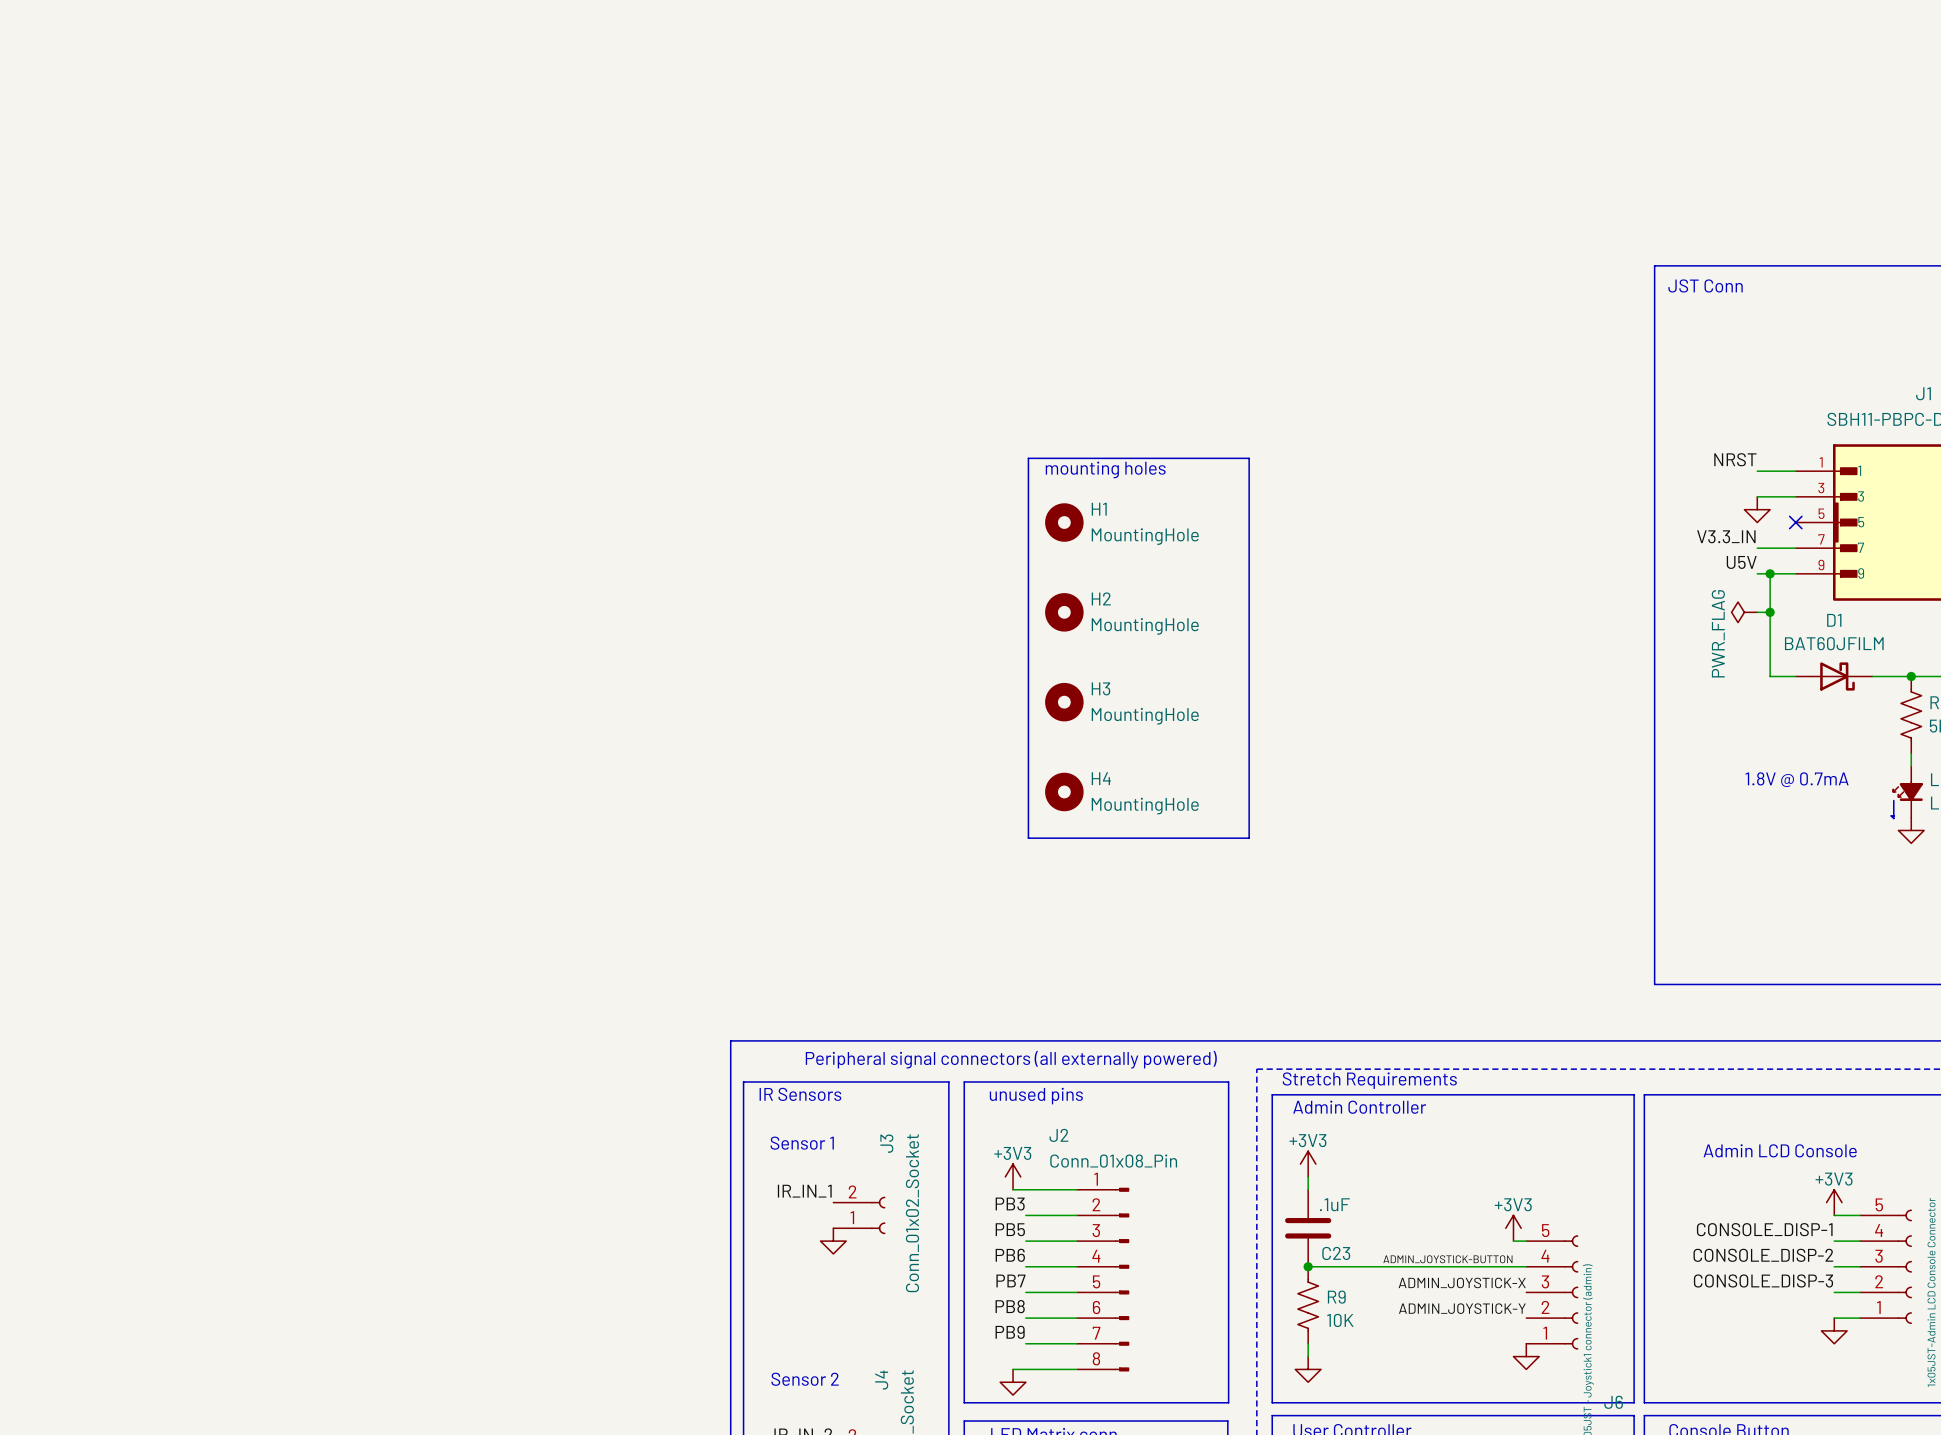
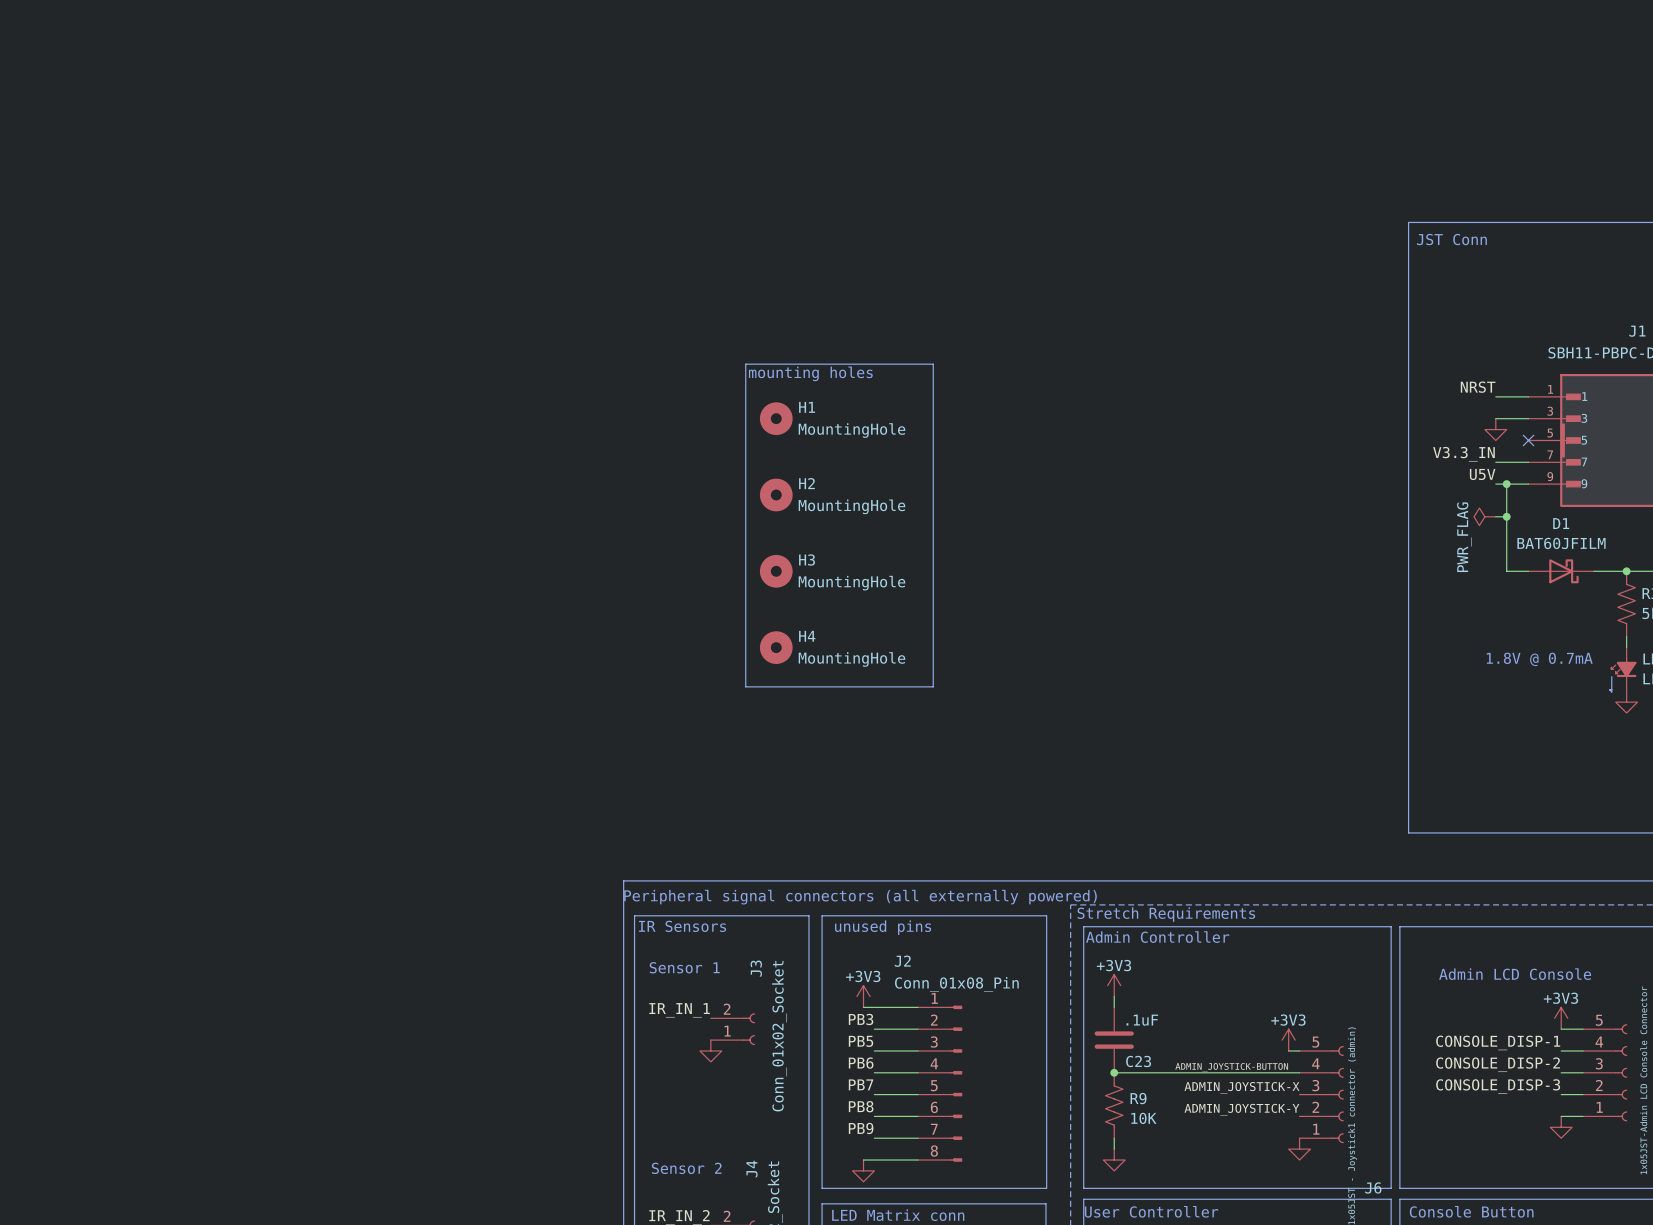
line: (1028, 458) (1249, 458) (1249, 838) (1028, 838) (1028, 458) -> (745, 364) (933, 364) (933, 686) (745, 686) (745, 364)
text position: mounting holes (1105, 469) -> mounting holes (810, 373)
H1 position: (1064, 522) -> (776, 418)
H2 position: (1064, 612) -> (776, 494)
H3 position: (1064, 702) -> (776, 571)
H4 position: (1064, 791) -> (776, 647)

